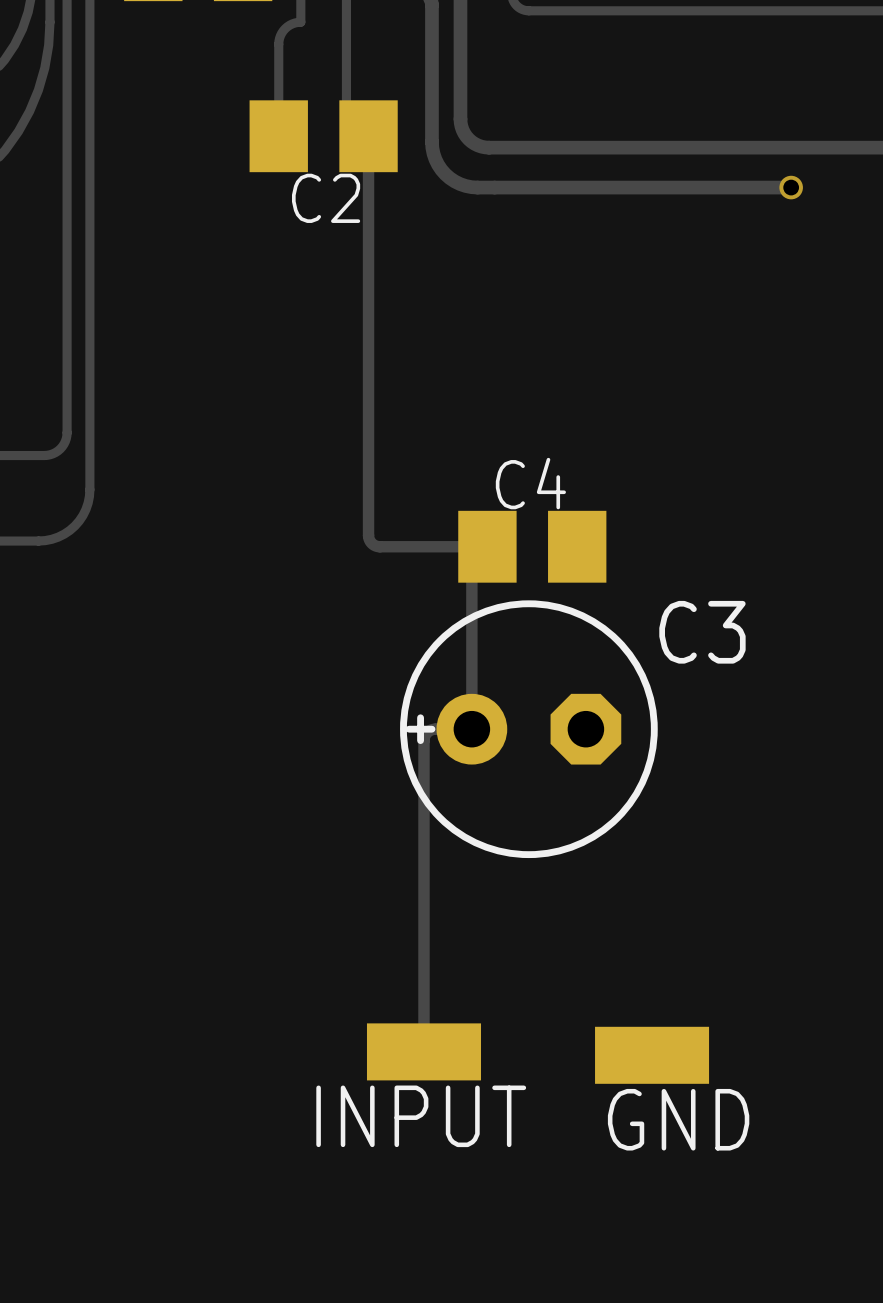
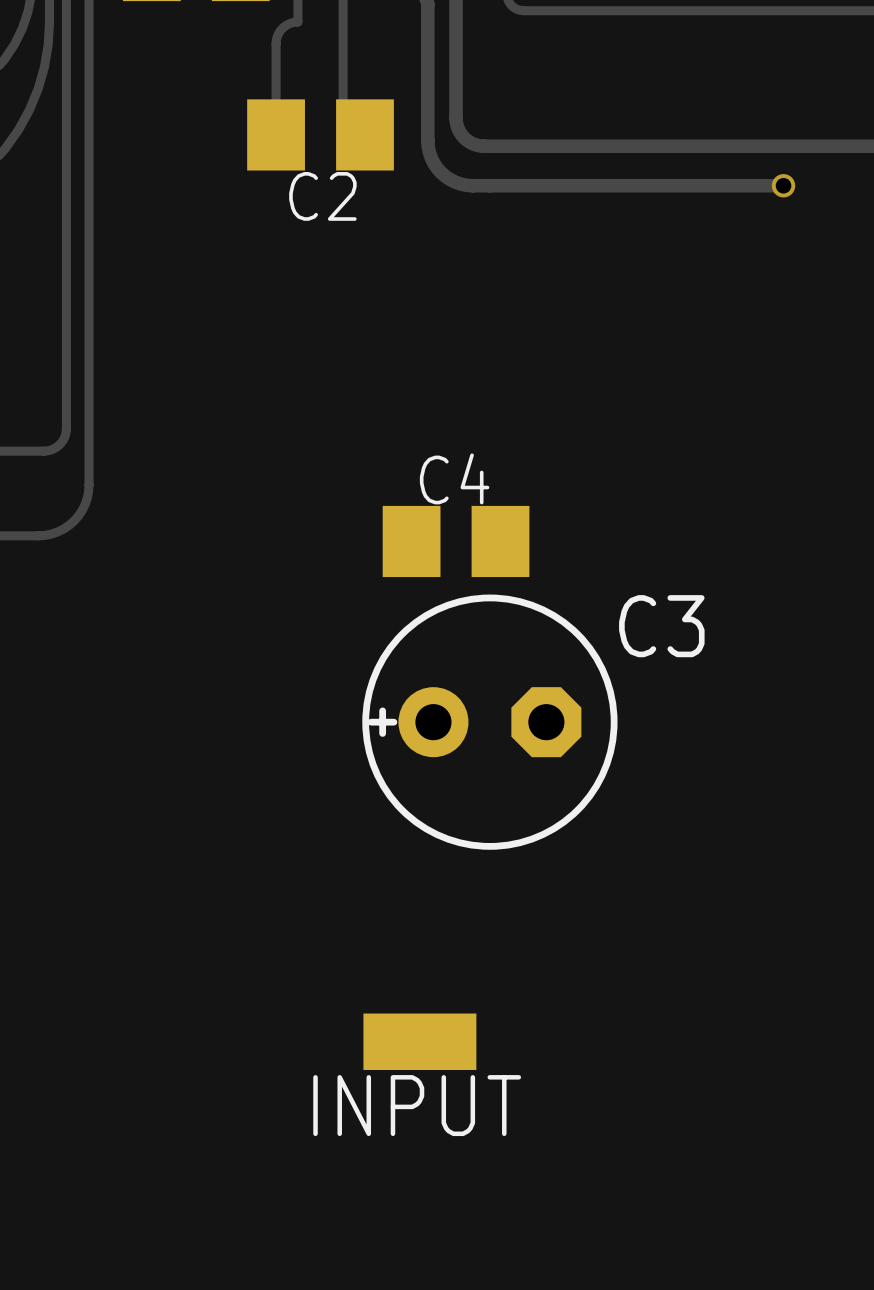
track: (368, 136) (368, 538) (371, 543) (378, 546) (487, 546) -> none
track: (483, 546) (475, 550) (471, 558) (471, 729) (432, 729) (427, 732) (424, 739) (423, 1051) -> none
C4 position: (532, 546) -> (456, 541)
C3 position: (528, 729) -> (489, 722)
GND: (652, 1055) -> none

